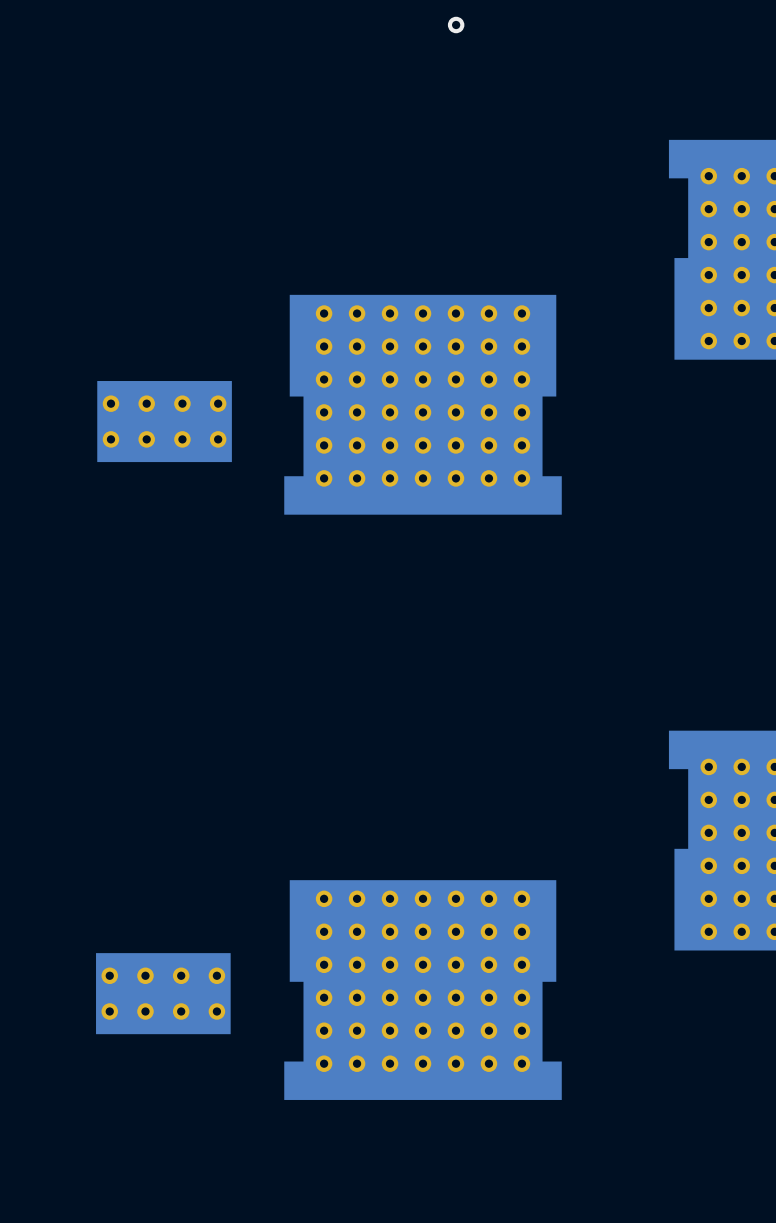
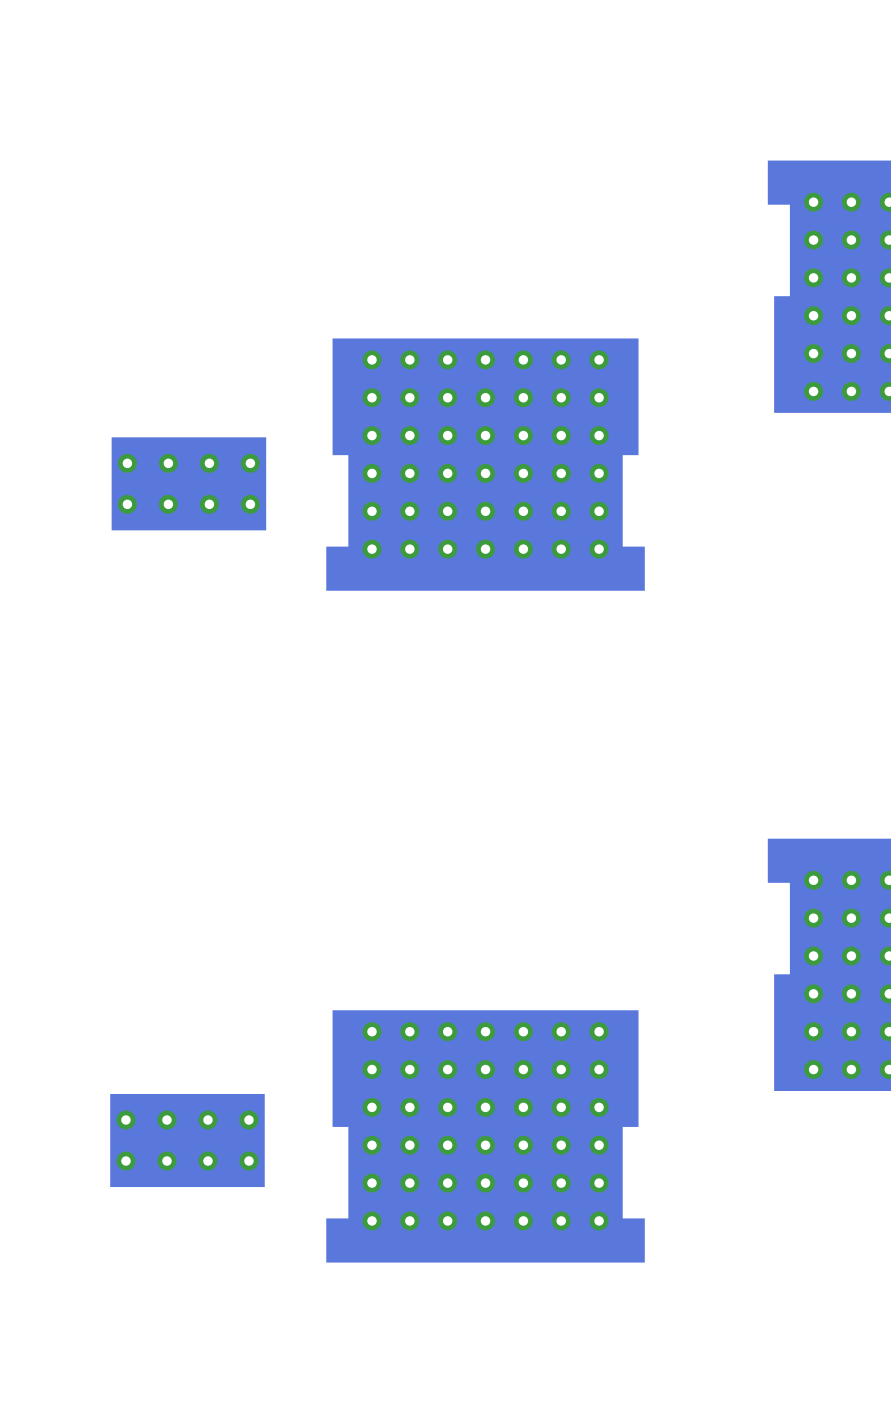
via: (456, 25) -> none

